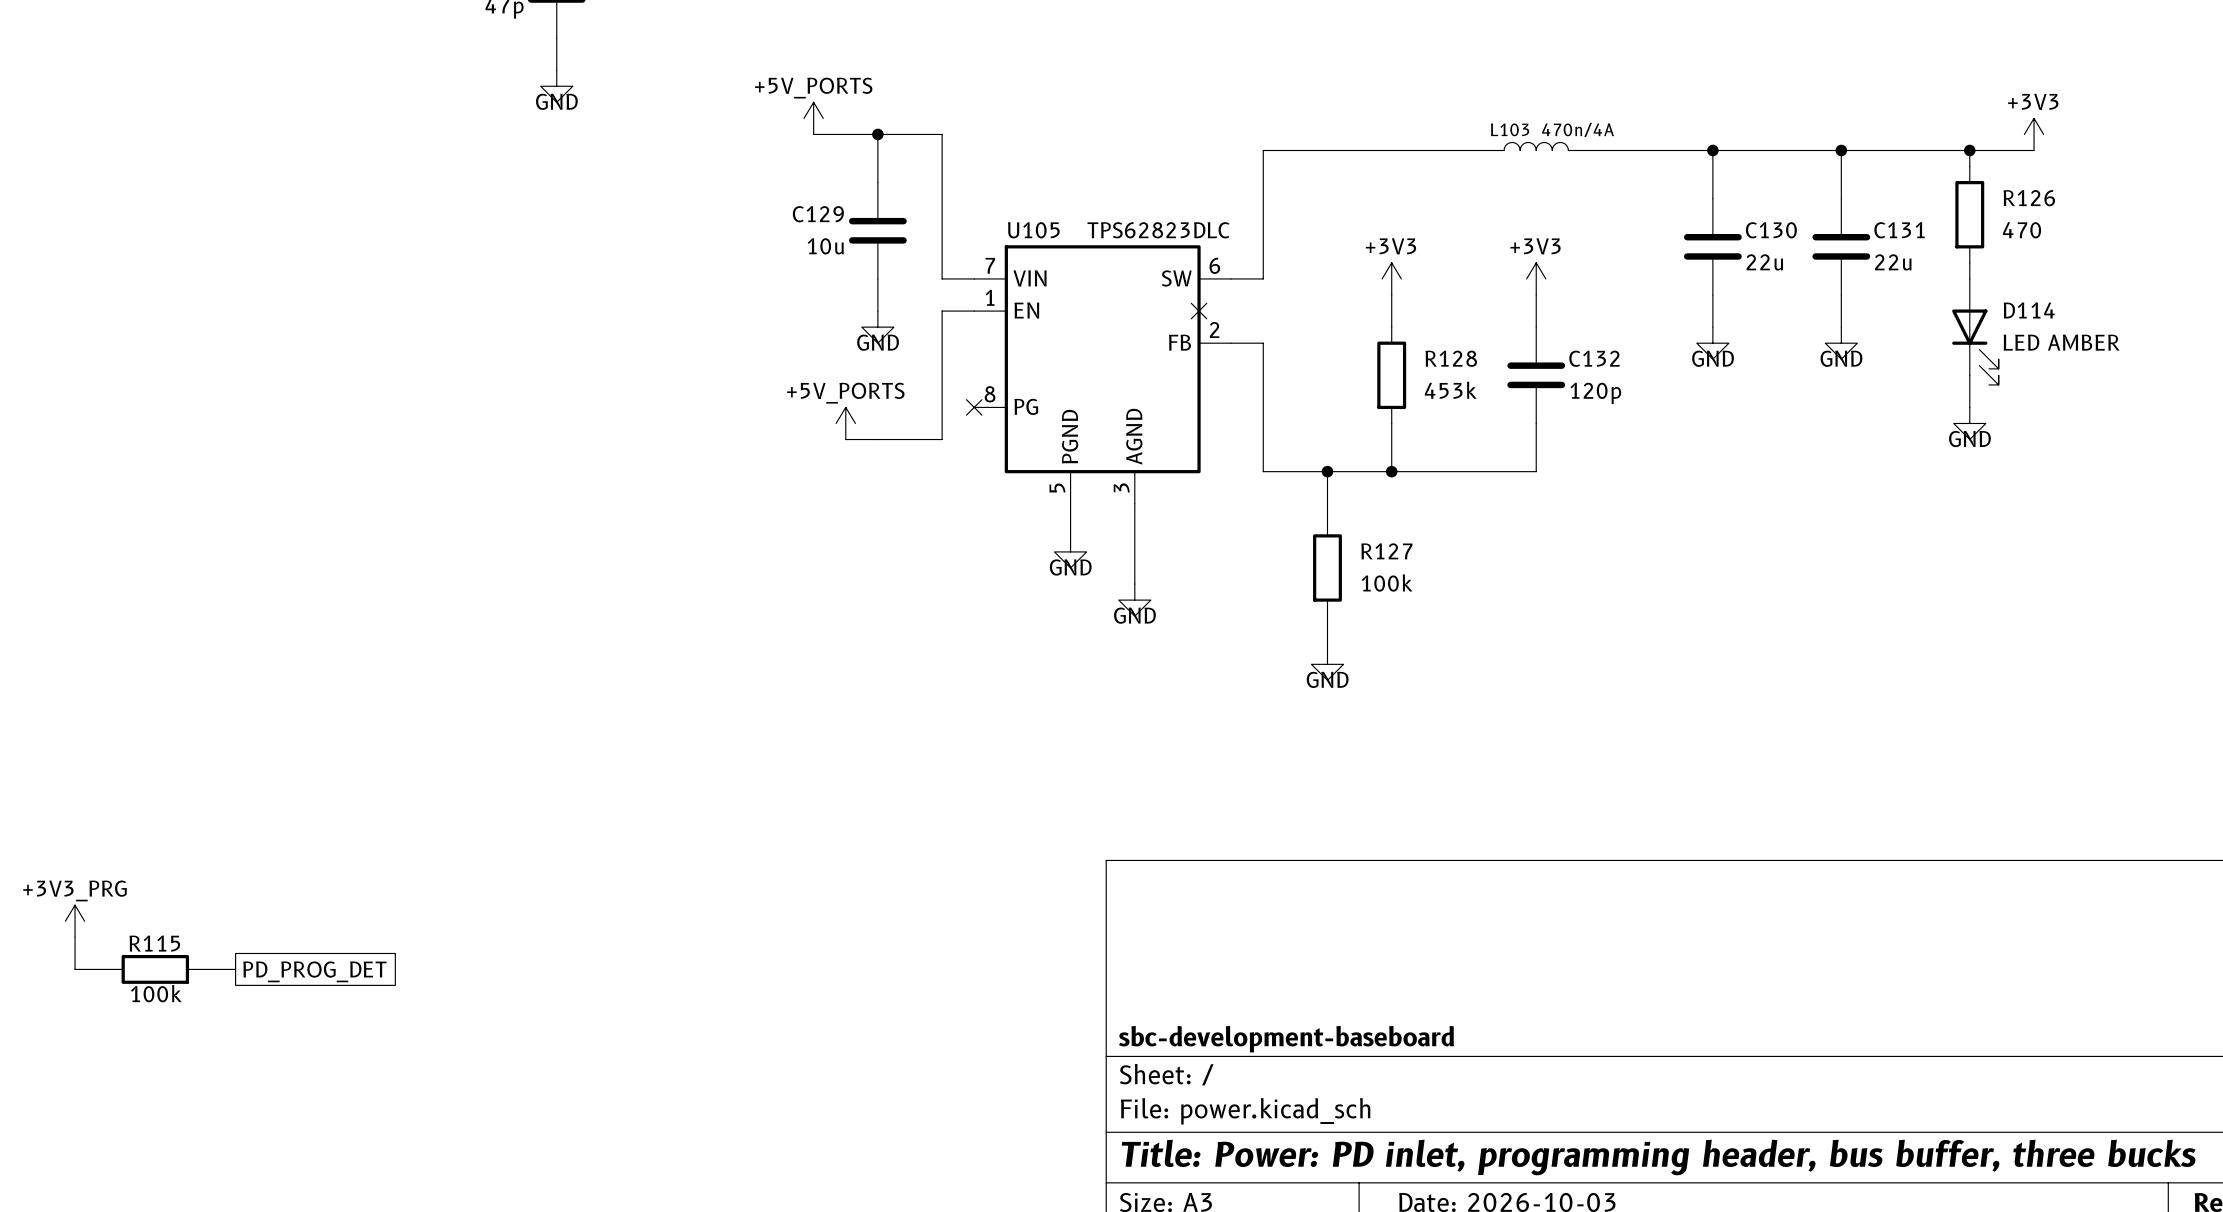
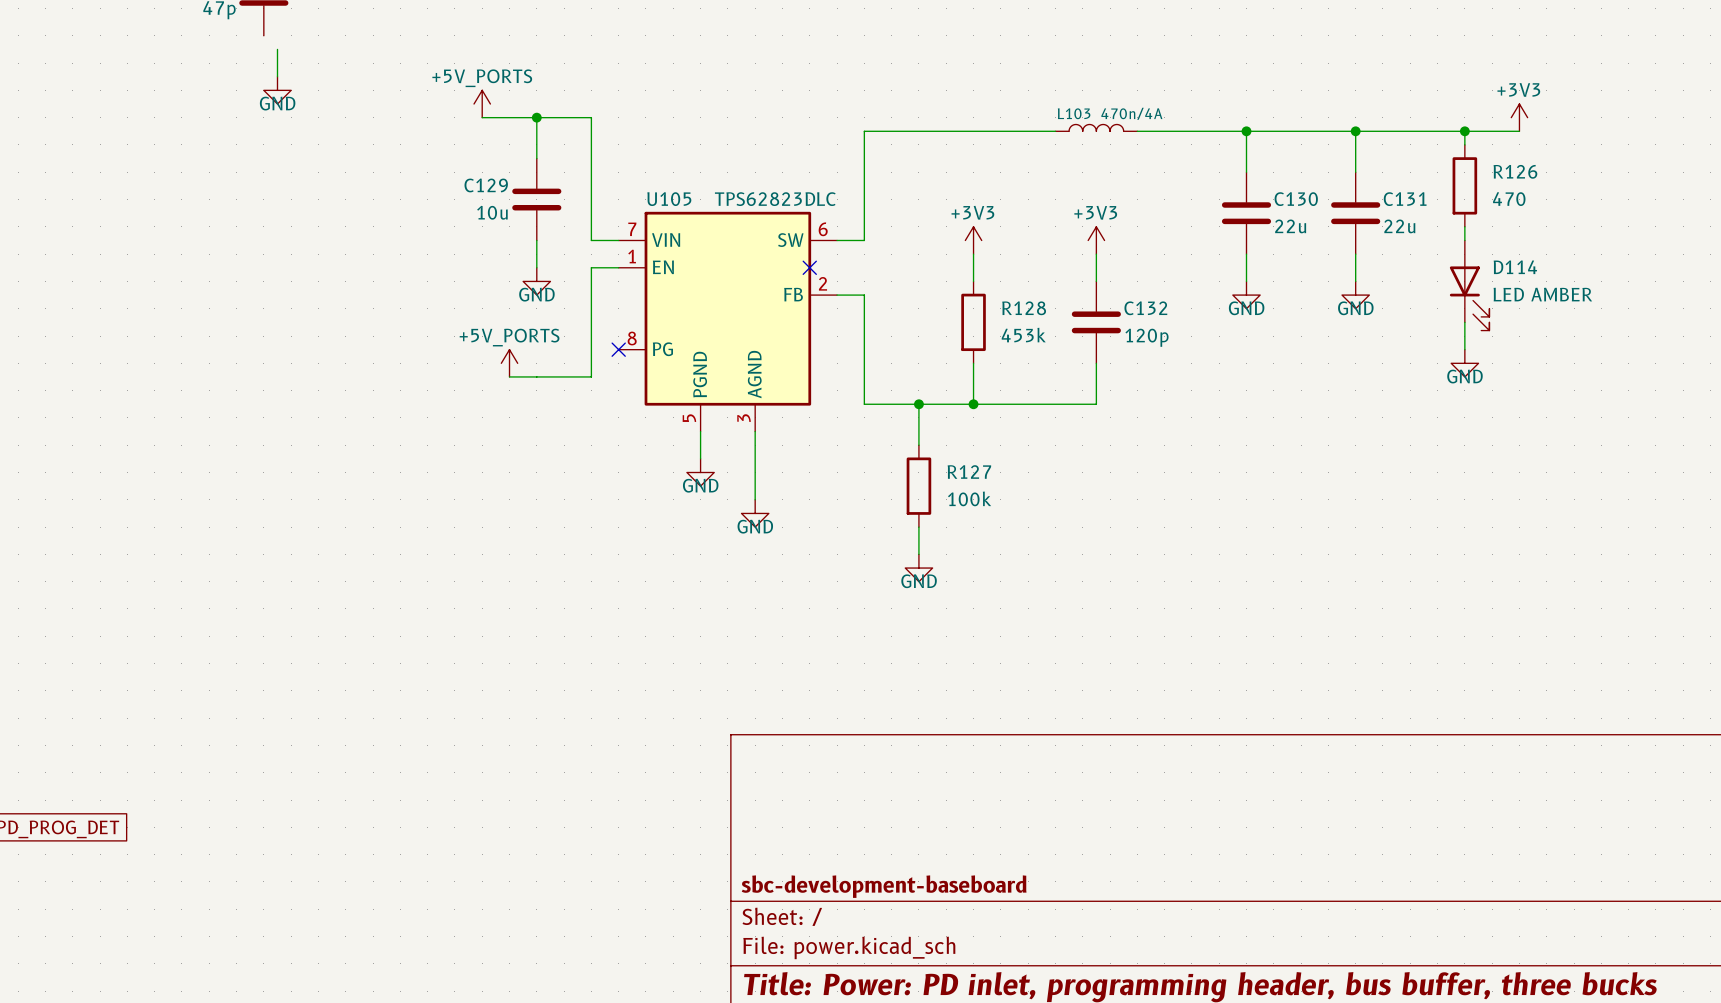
wire: (556, 38) (556, 70) -> (277, 49) (277, 76)
power symbol position: GND (556, 86) -> GND (277, 90)

